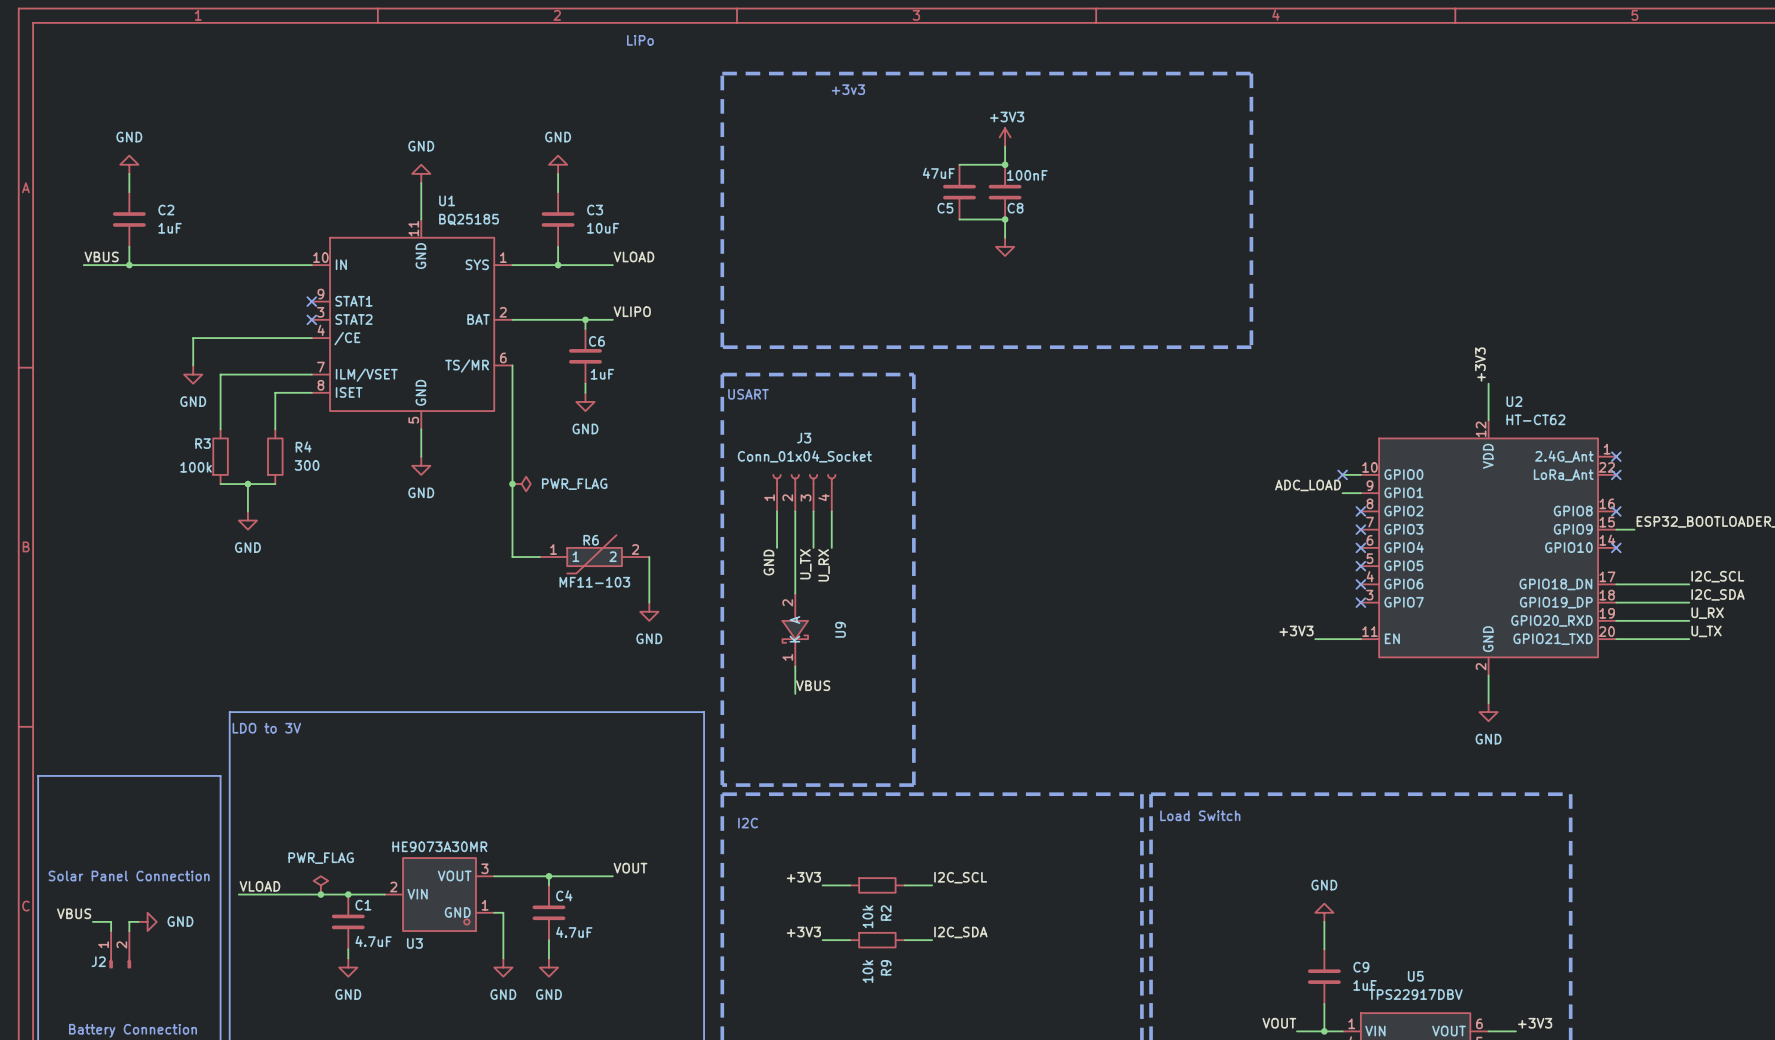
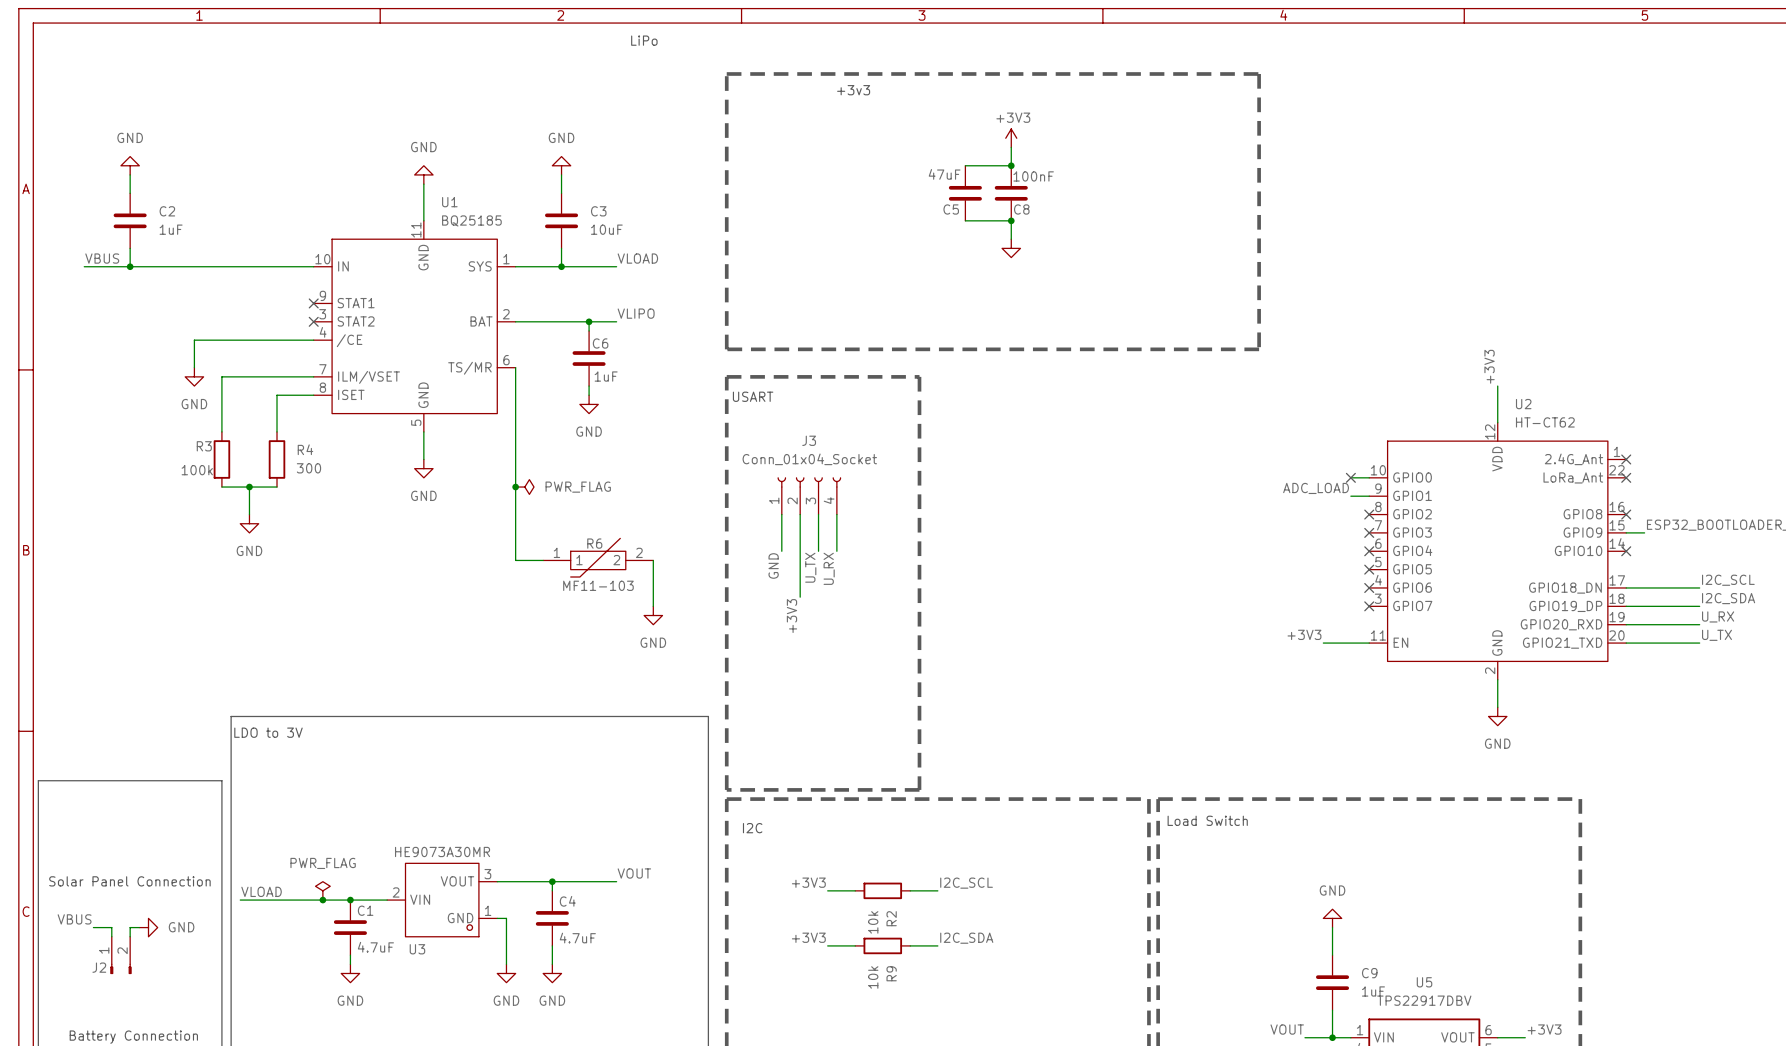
label: none -> +3V3 (791, 616)
U9: (795, 630) -> none
wire: (795, 666) (795, 693) -> none
label: VBUS (813, 685) -> none

